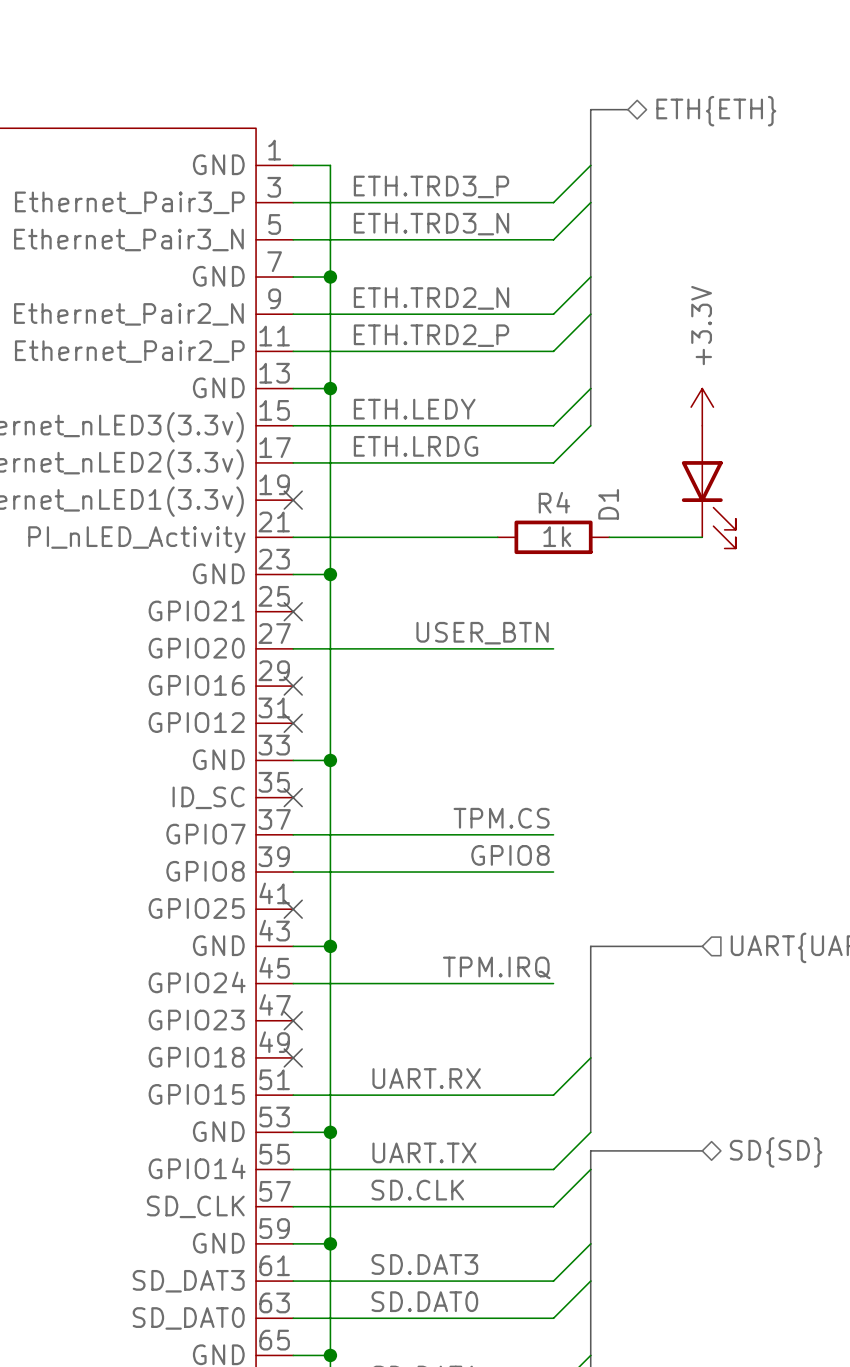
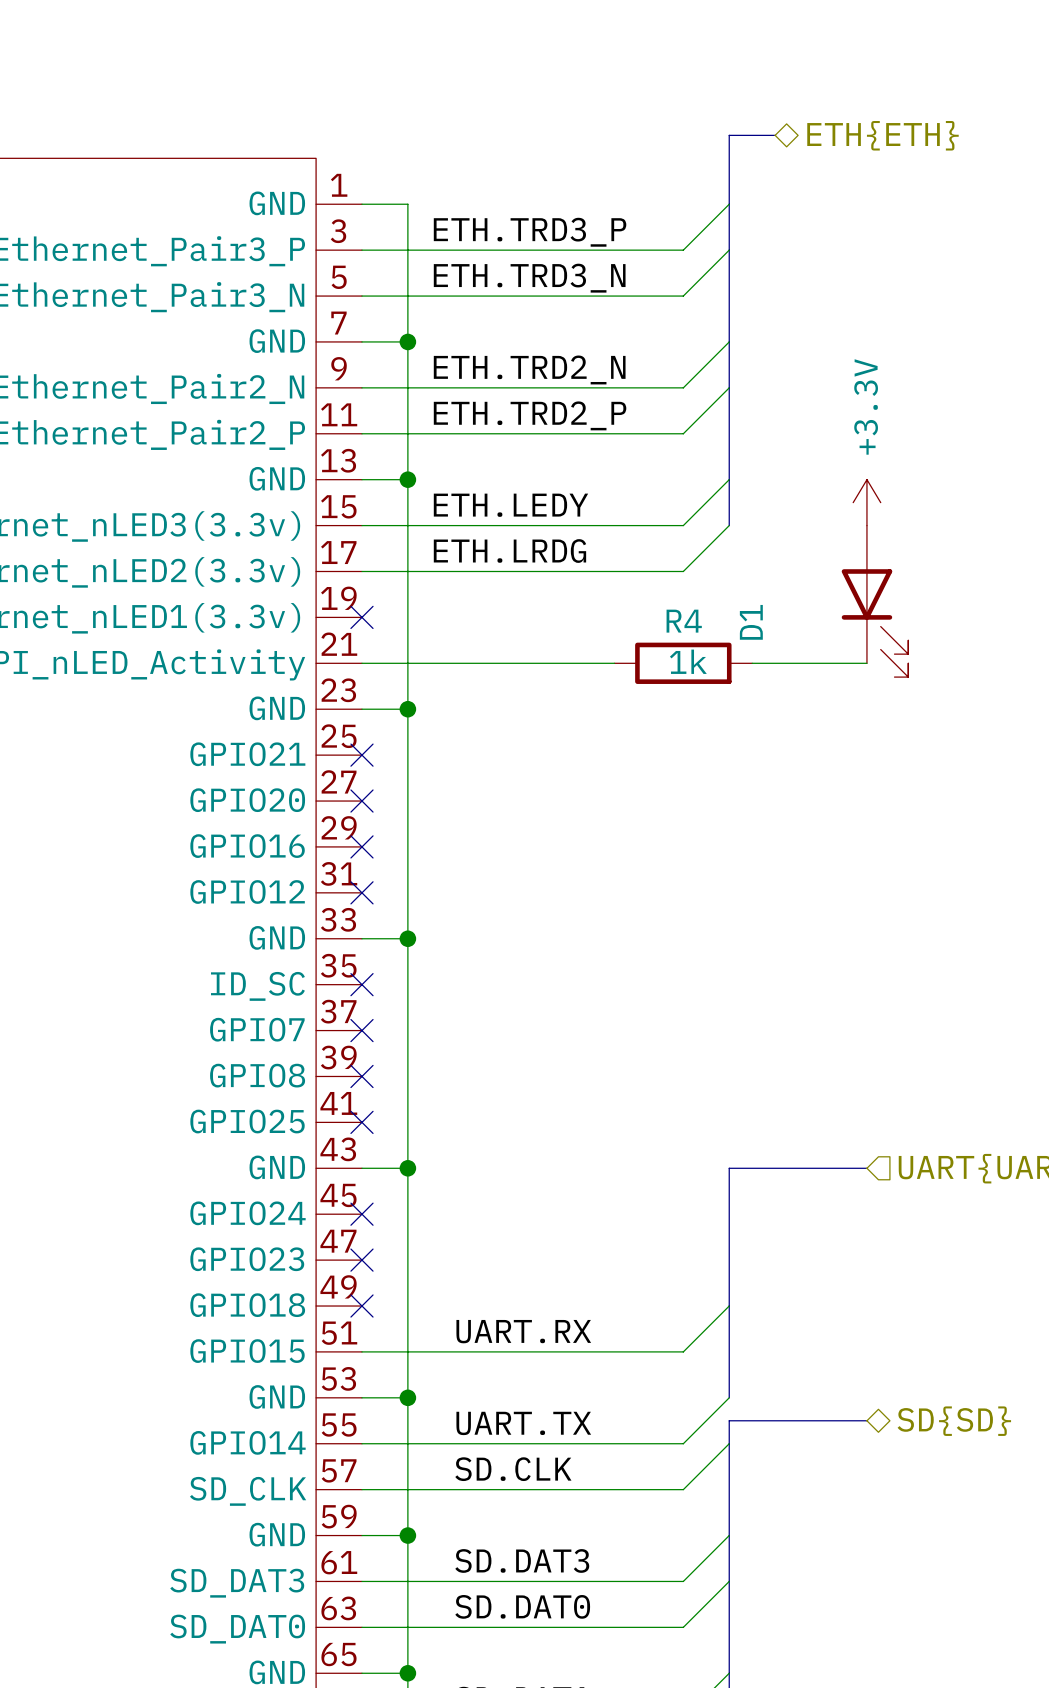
label: USER_BTN (482, 633) -> none
wire: (293, 648) (553, 648) -> none
no-connect mark: none -> (361, 801)
label: TPM.CS (501, 818) -> none
wire: (293, 834) (553, 834) -> none
no-connect mark: none -> (361, 1030)
label: GPIO8 (510, 855) -> none
wire: (293, 872) (553, 872) -> none
no-connect mark: none -> (361, 1076)
label: TPM.IRQ (496, 967) -> none
wire: (293, 983) (553, 983) -> none
no-connect mark: none -> (361, 1214)

